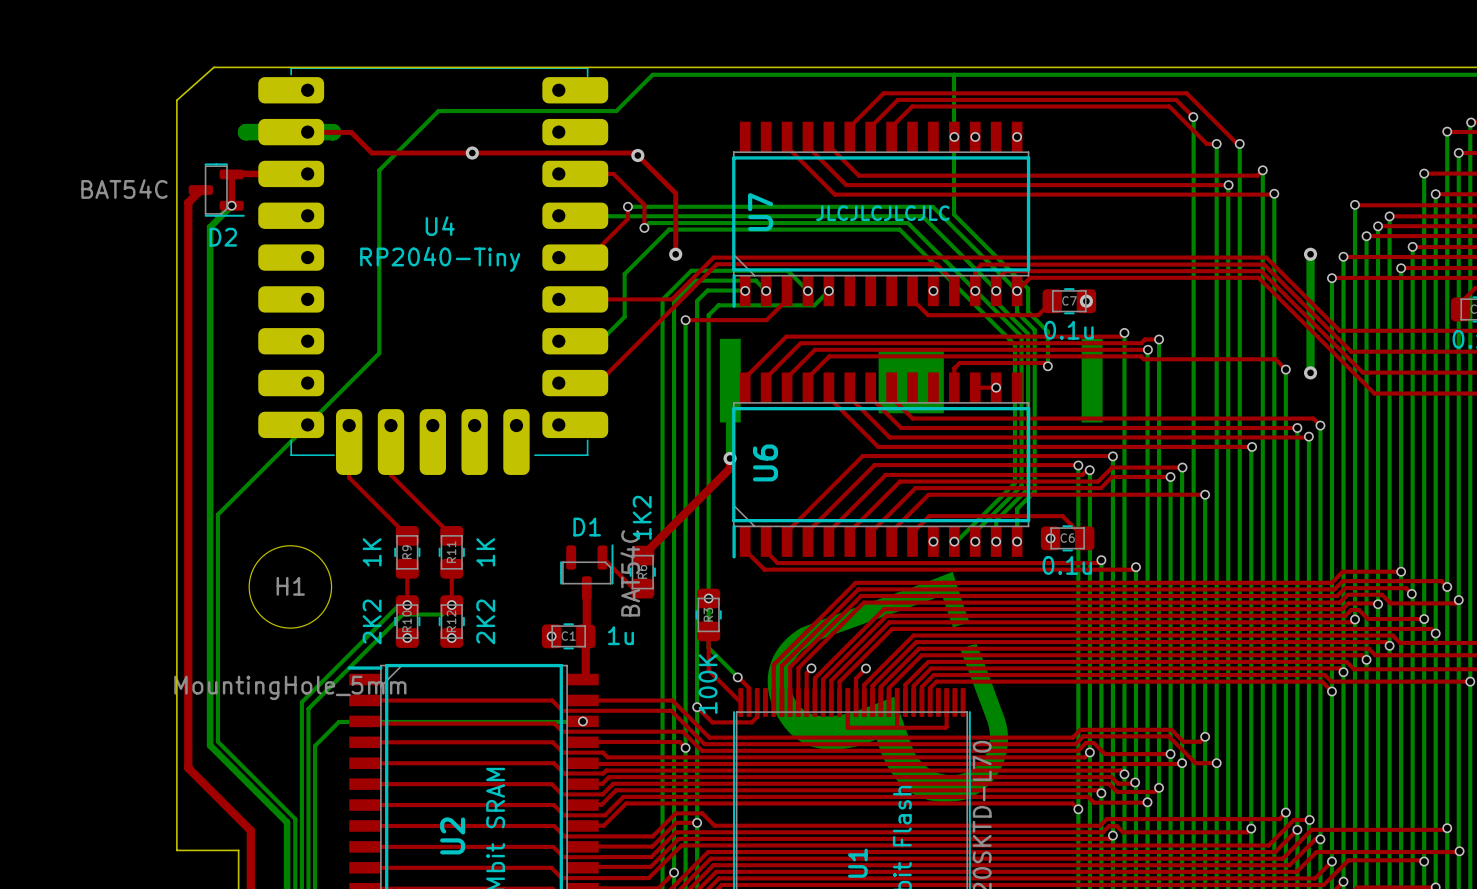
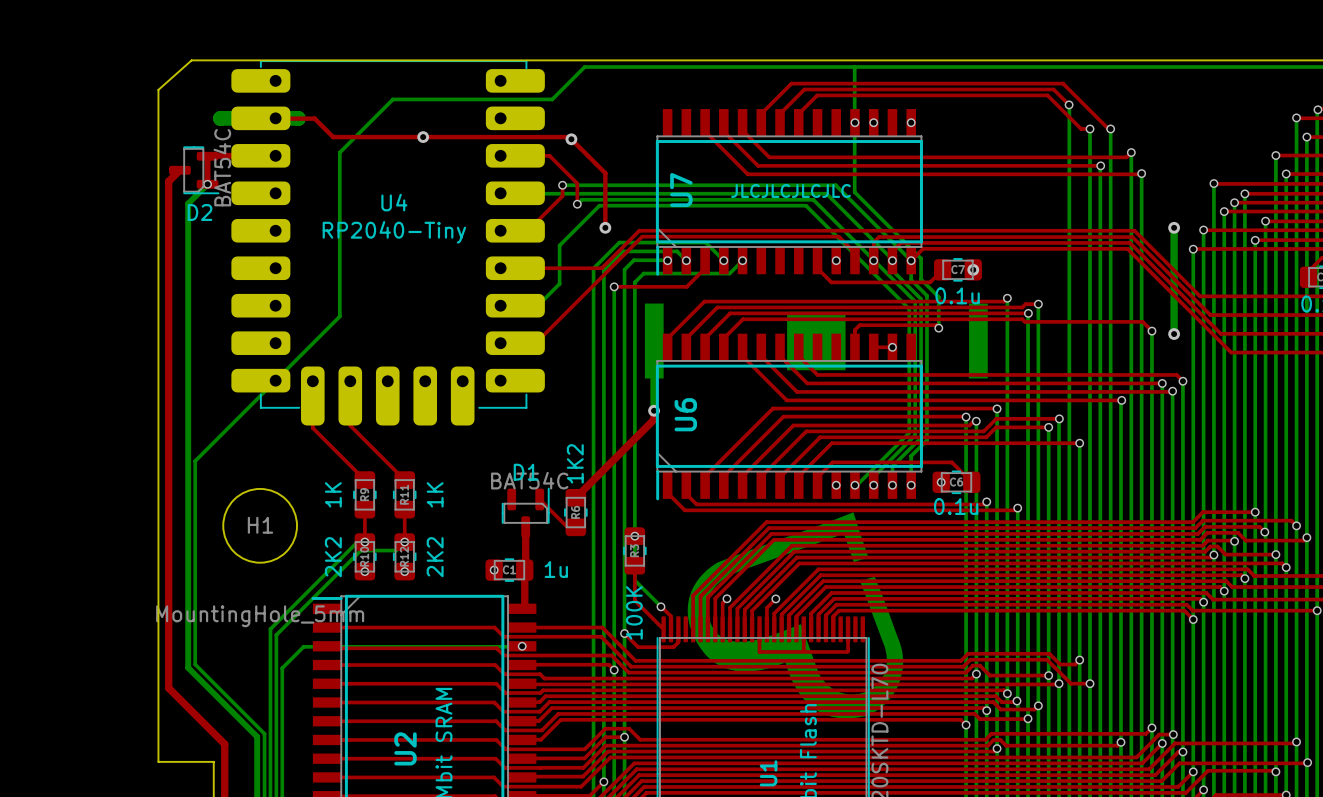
D2 value rotation: 0° (124, 189) -> 90° counterclockwise (222, 167)
D2 value position: BAT54C (124, 189) -> BAT54C (222, 167)
D1 value rotation: 0° (630, 573) -> 90° clockwise (529, 480)

